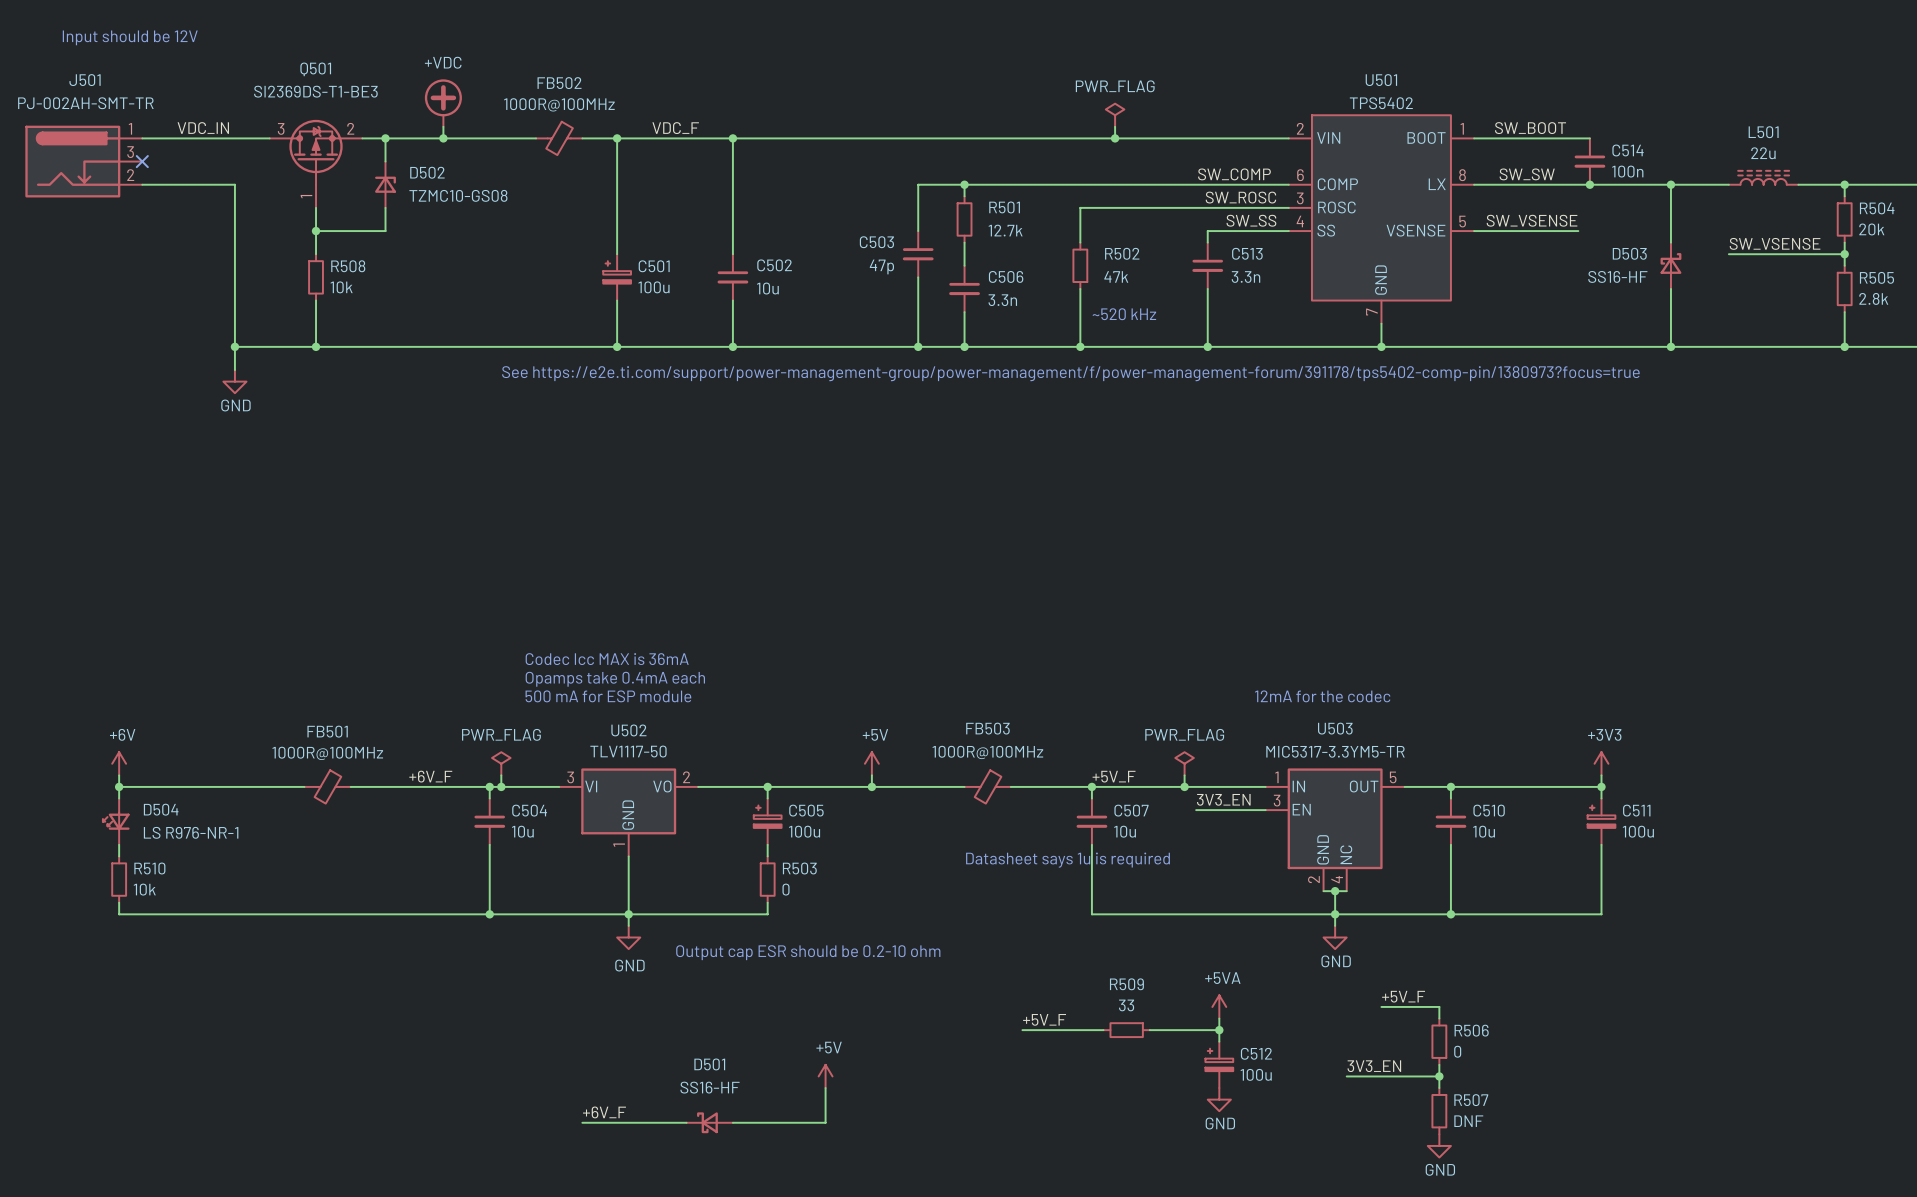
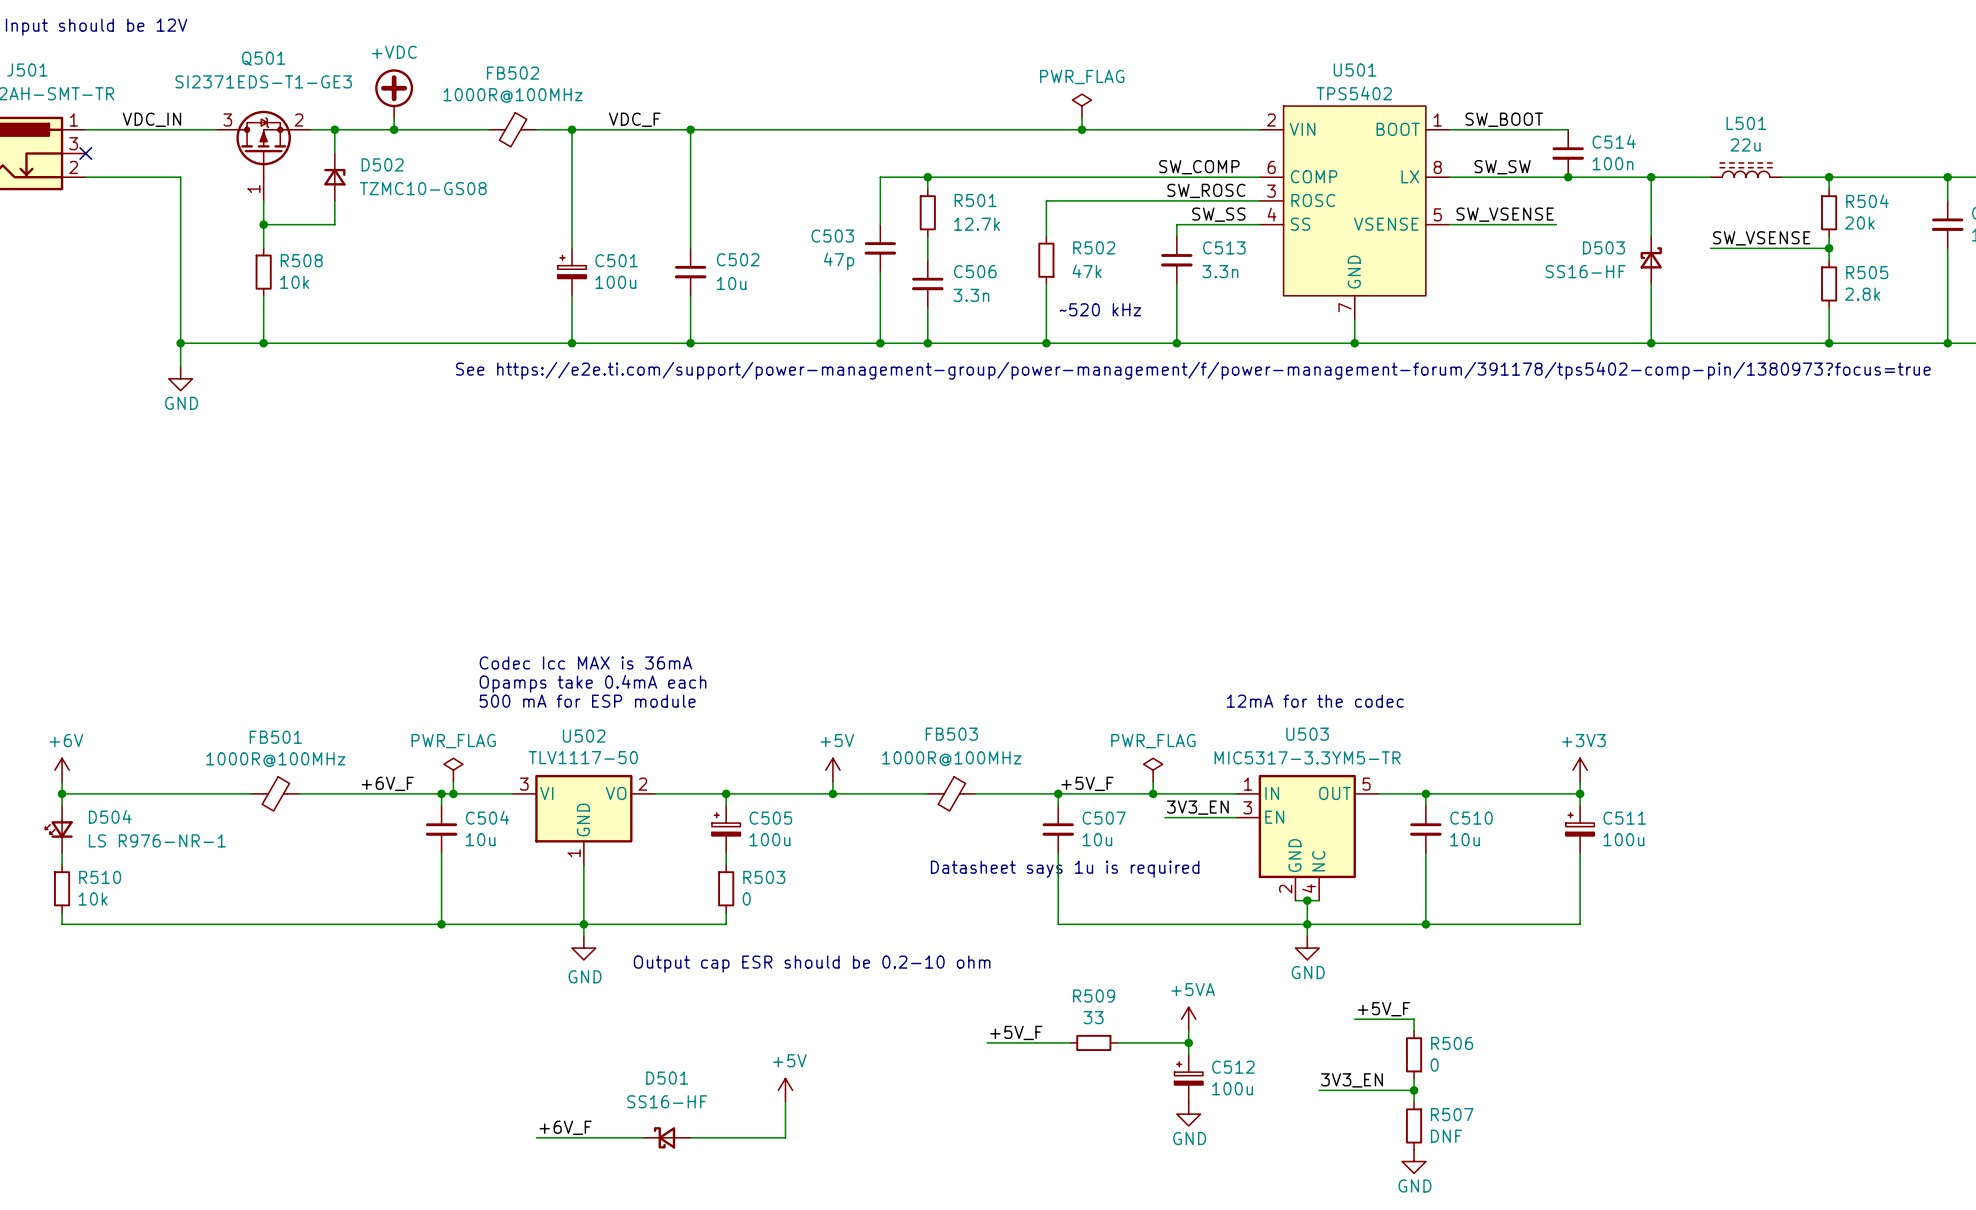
Q501 value: SI2369DS-T1-BE3 (315, 91) -> SI2371EDS-T1-GE3 (263, 81)

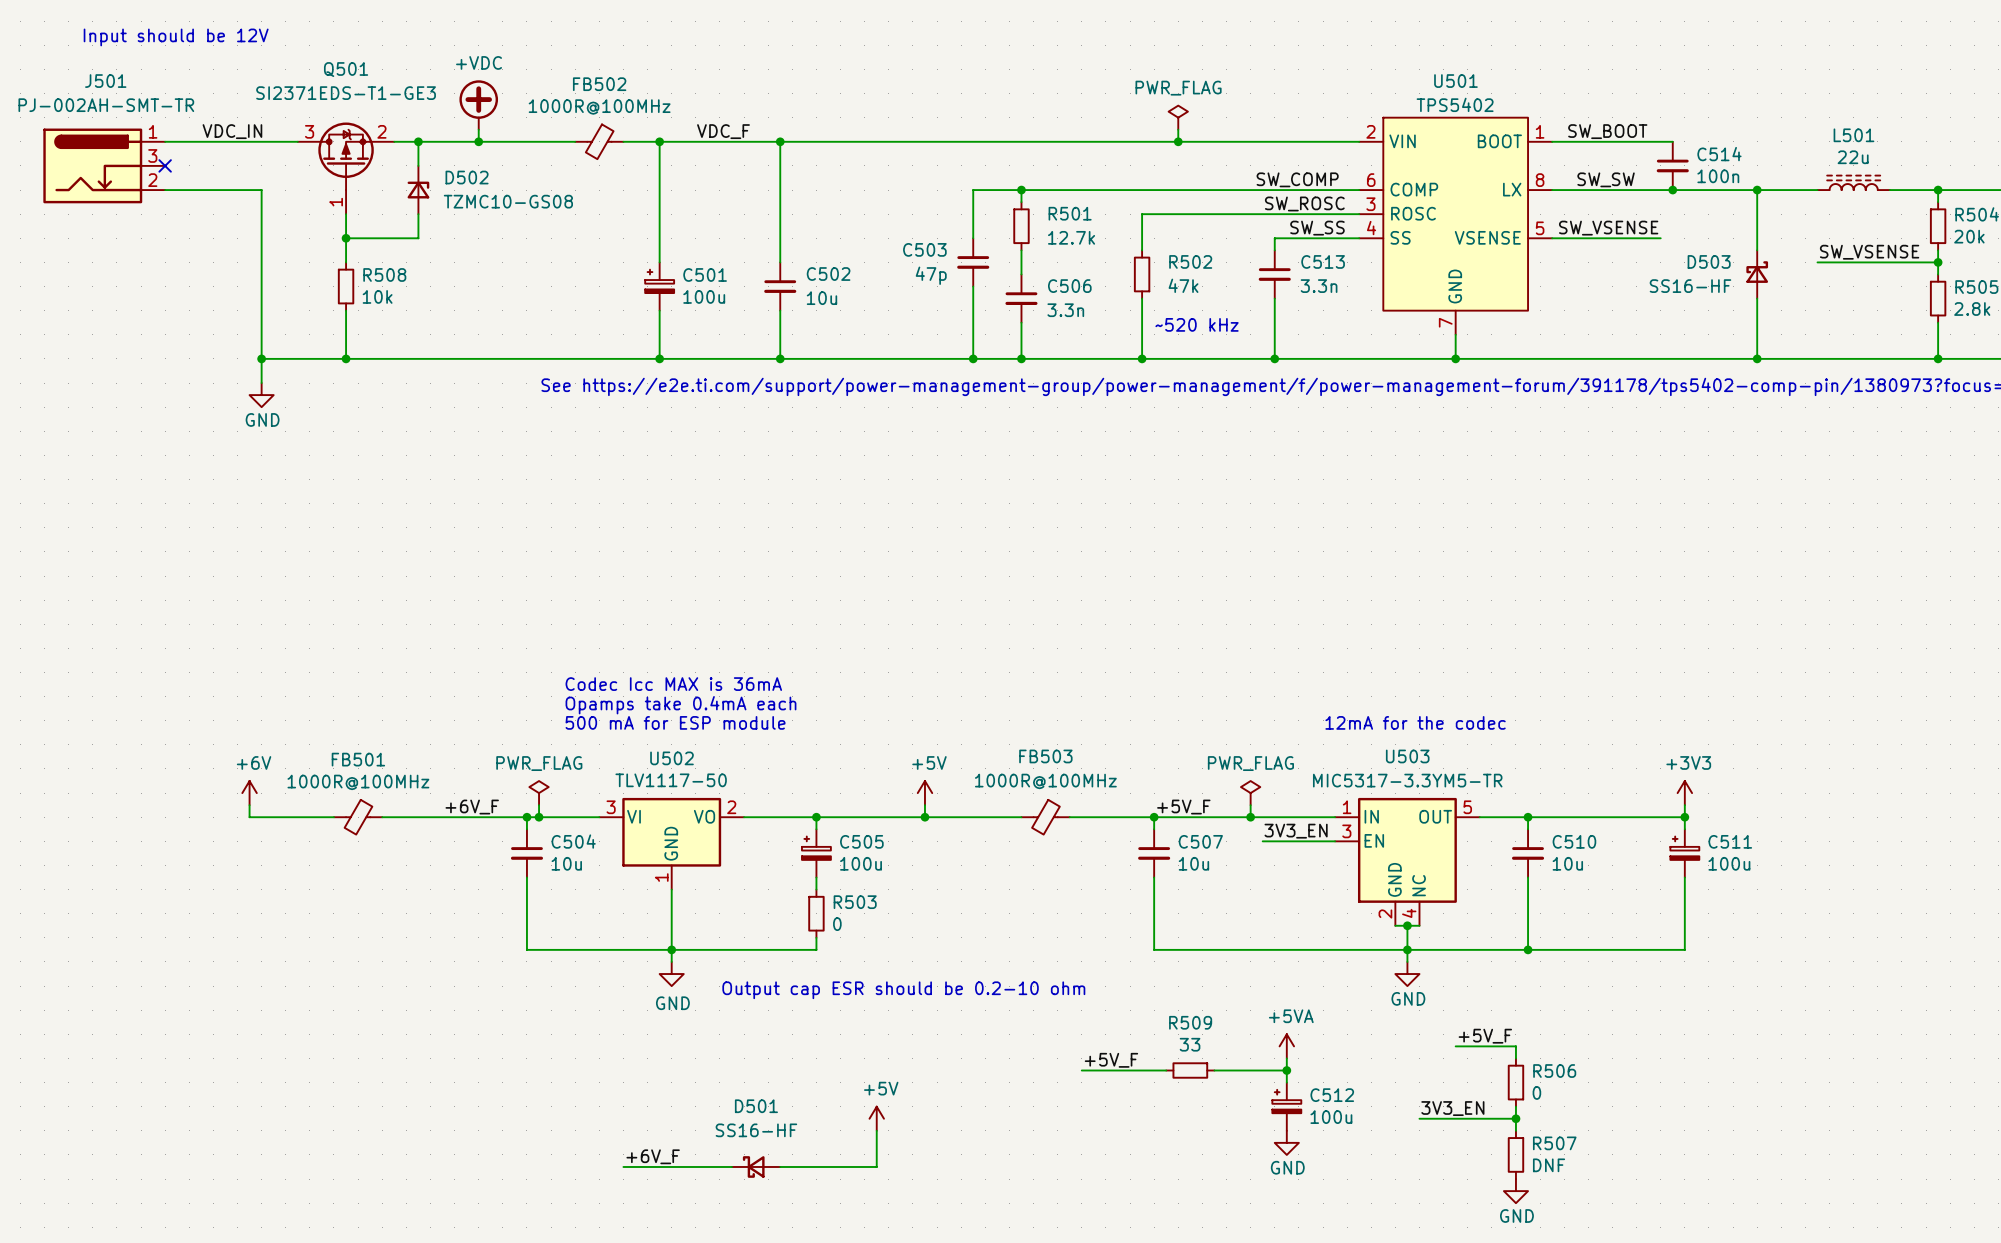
power symbol position: +6V (62, 770) -> +6V (249, 793)
wire: (62, 782) (62, 805) -> none
wire: (62, 793) (168, 793) -> (249, 805) (249, 817)
junction: (62, 793) -> none
D504: LS R976-NR-1 (59, 829) -> none
wire: (62, 853) (62, 865) -> none
text: Datasheet says 1u is required (1065, 869) -> none
R510: 10k (62, 888) -> none
wire: (62, 912) (62, 924) (441, 924) -> none
junction: (441, 924) -> none

